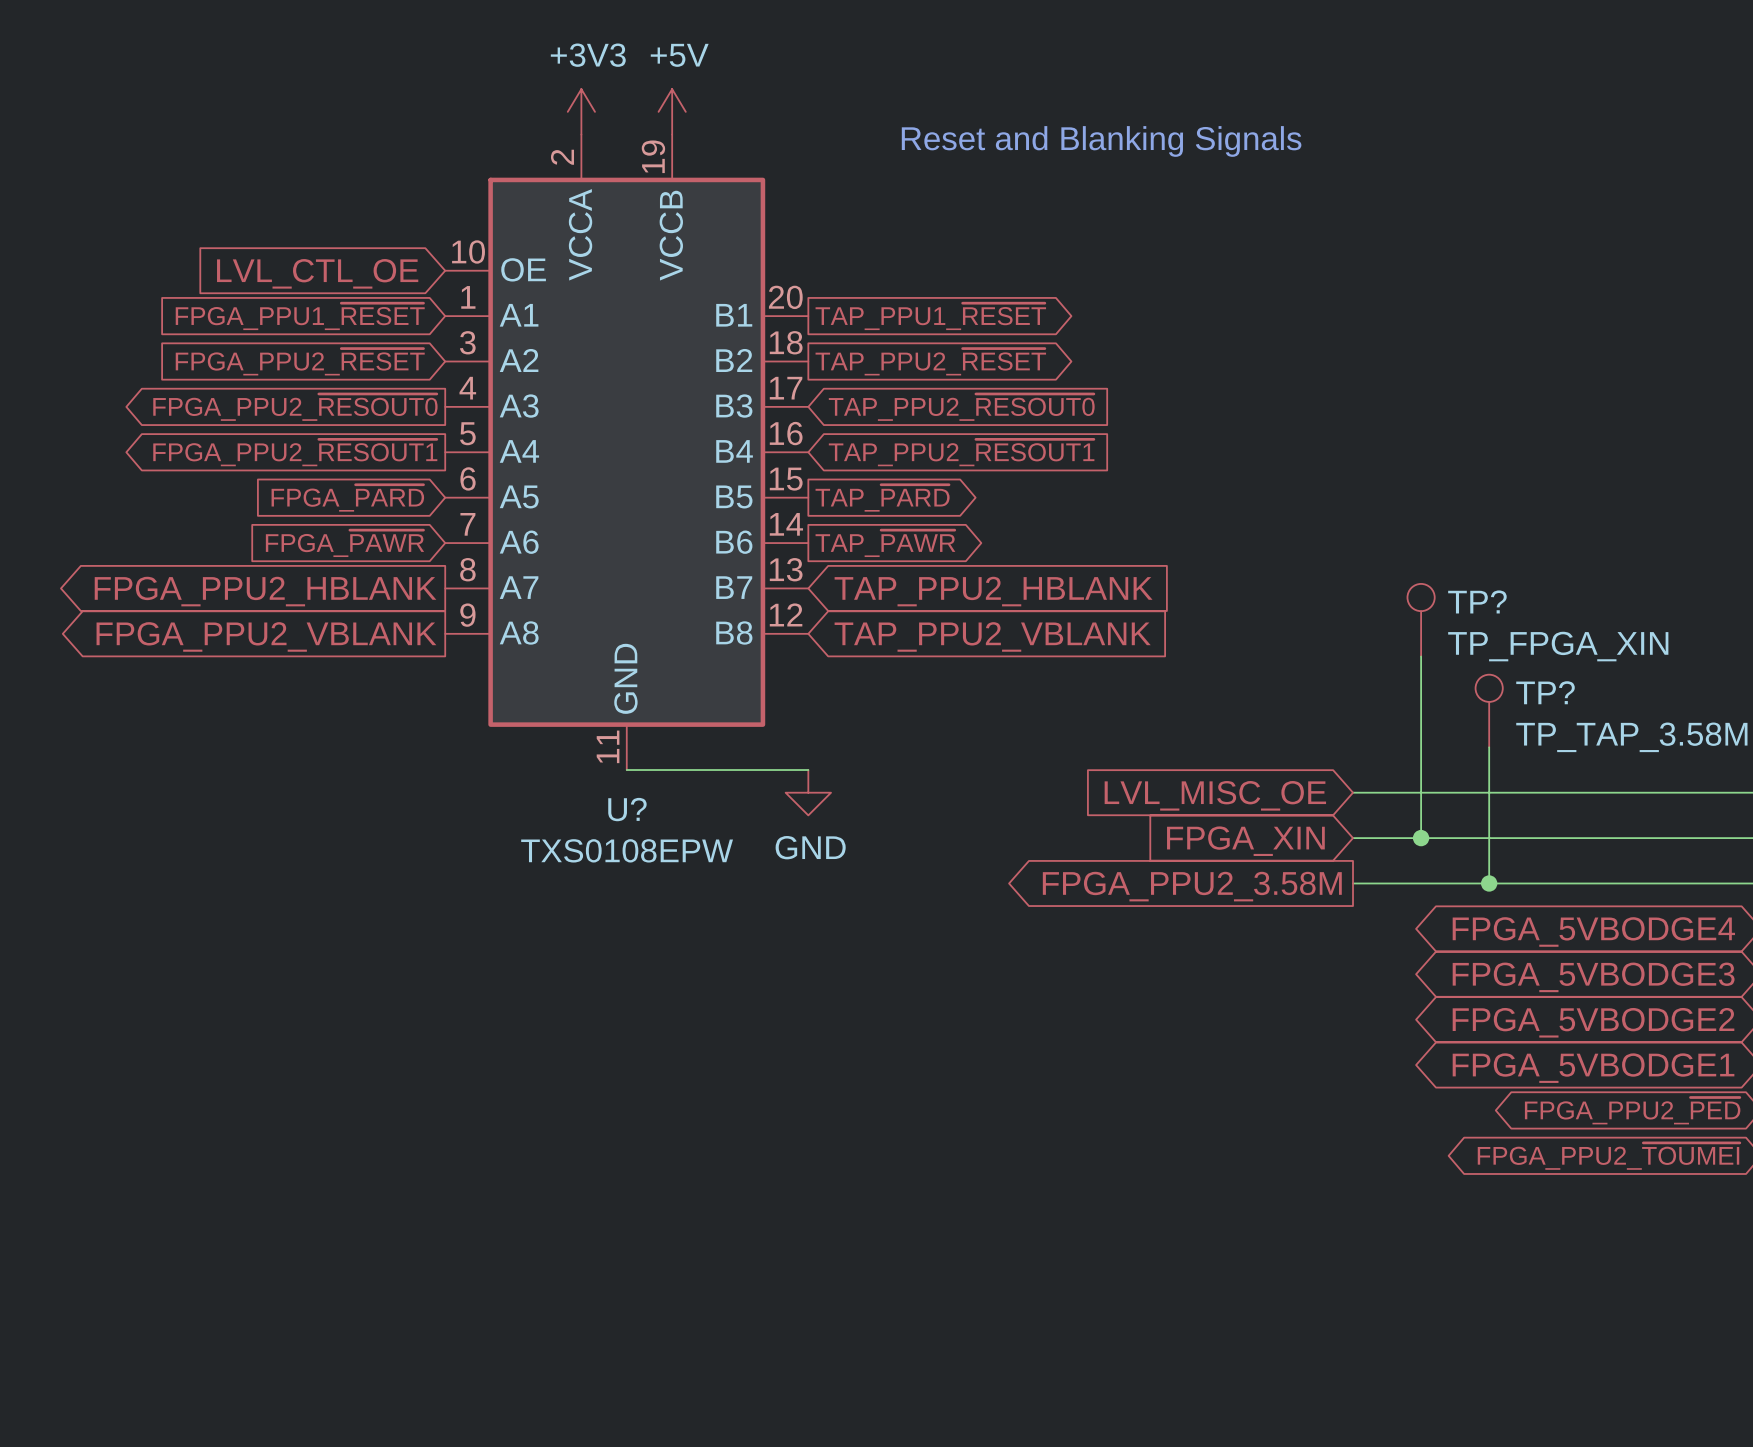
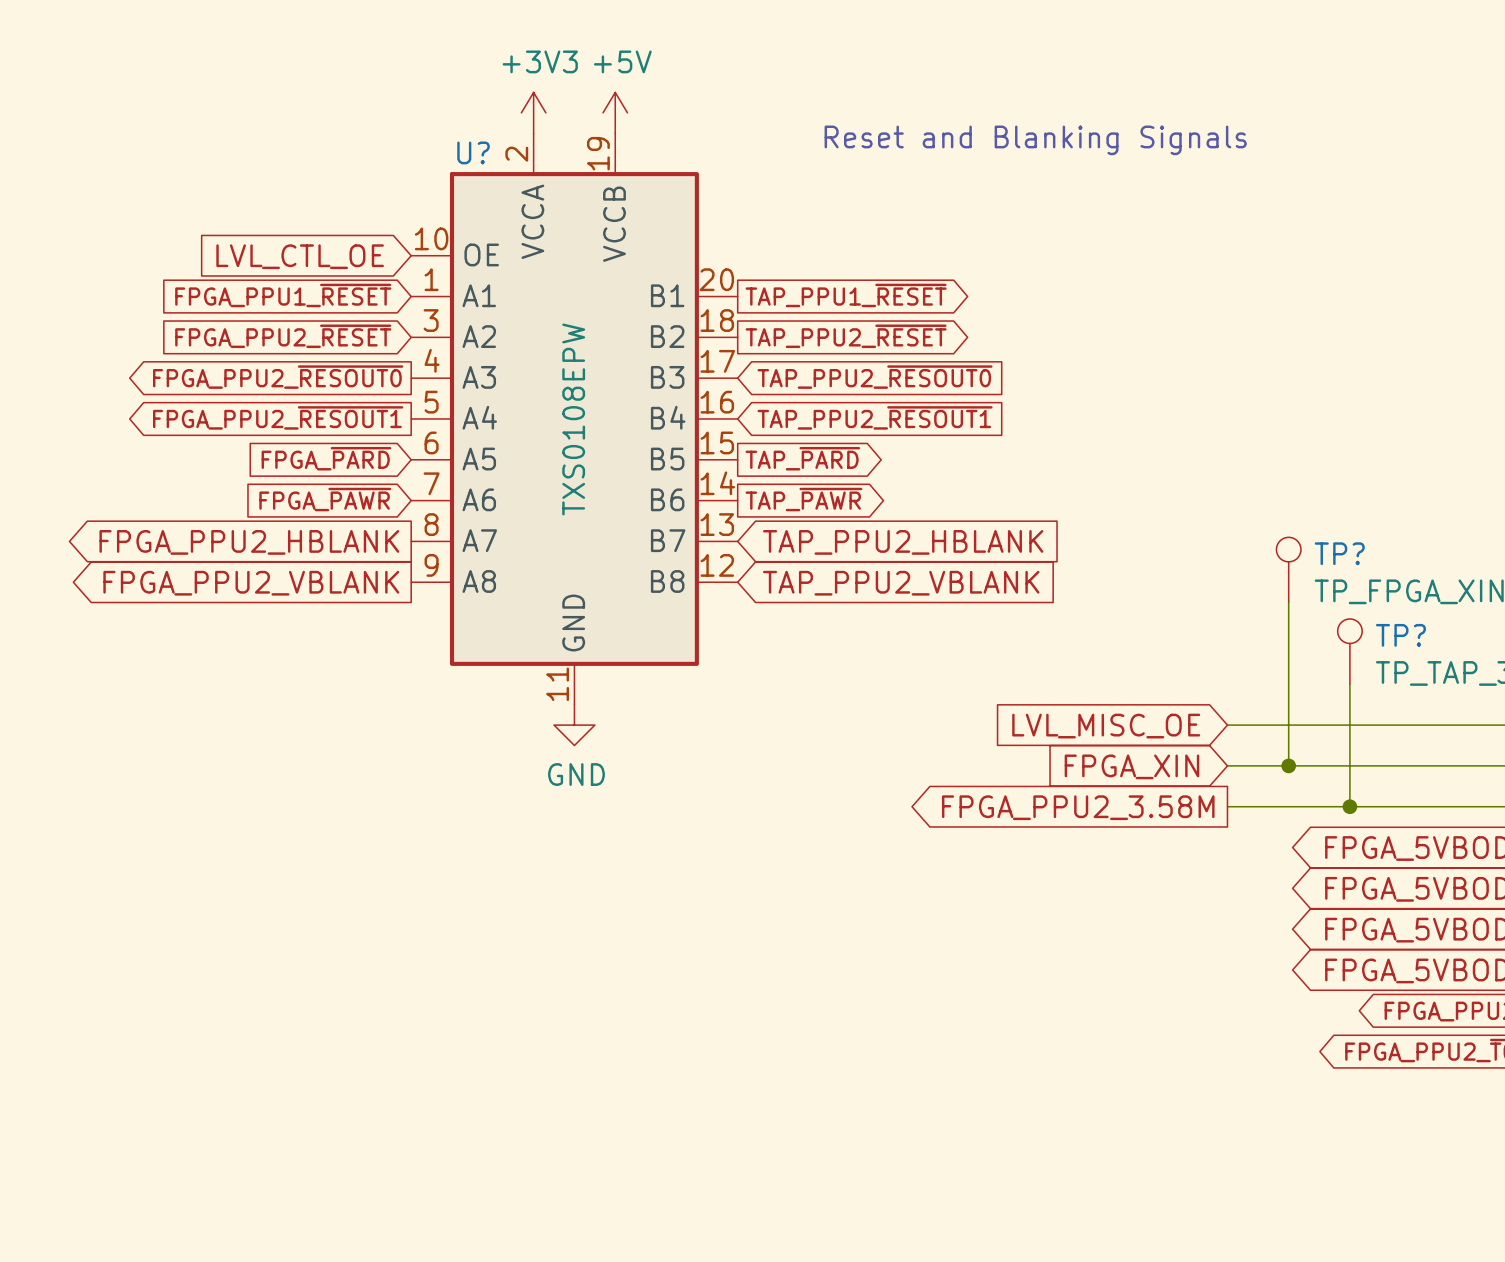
wire: (626, 770) (808, 770) -> none
power symbol position: GND (808, 792) -> GND (574, 725)
U? name position: U? (627, 809) -> U? (473, 152)
U? value rotation: 0° (627, 850) -> 90° counterclockwise (573, 419)
U? value position: TXS0108EPW (627, 850) -> TXS0108EPW (573, 419)

